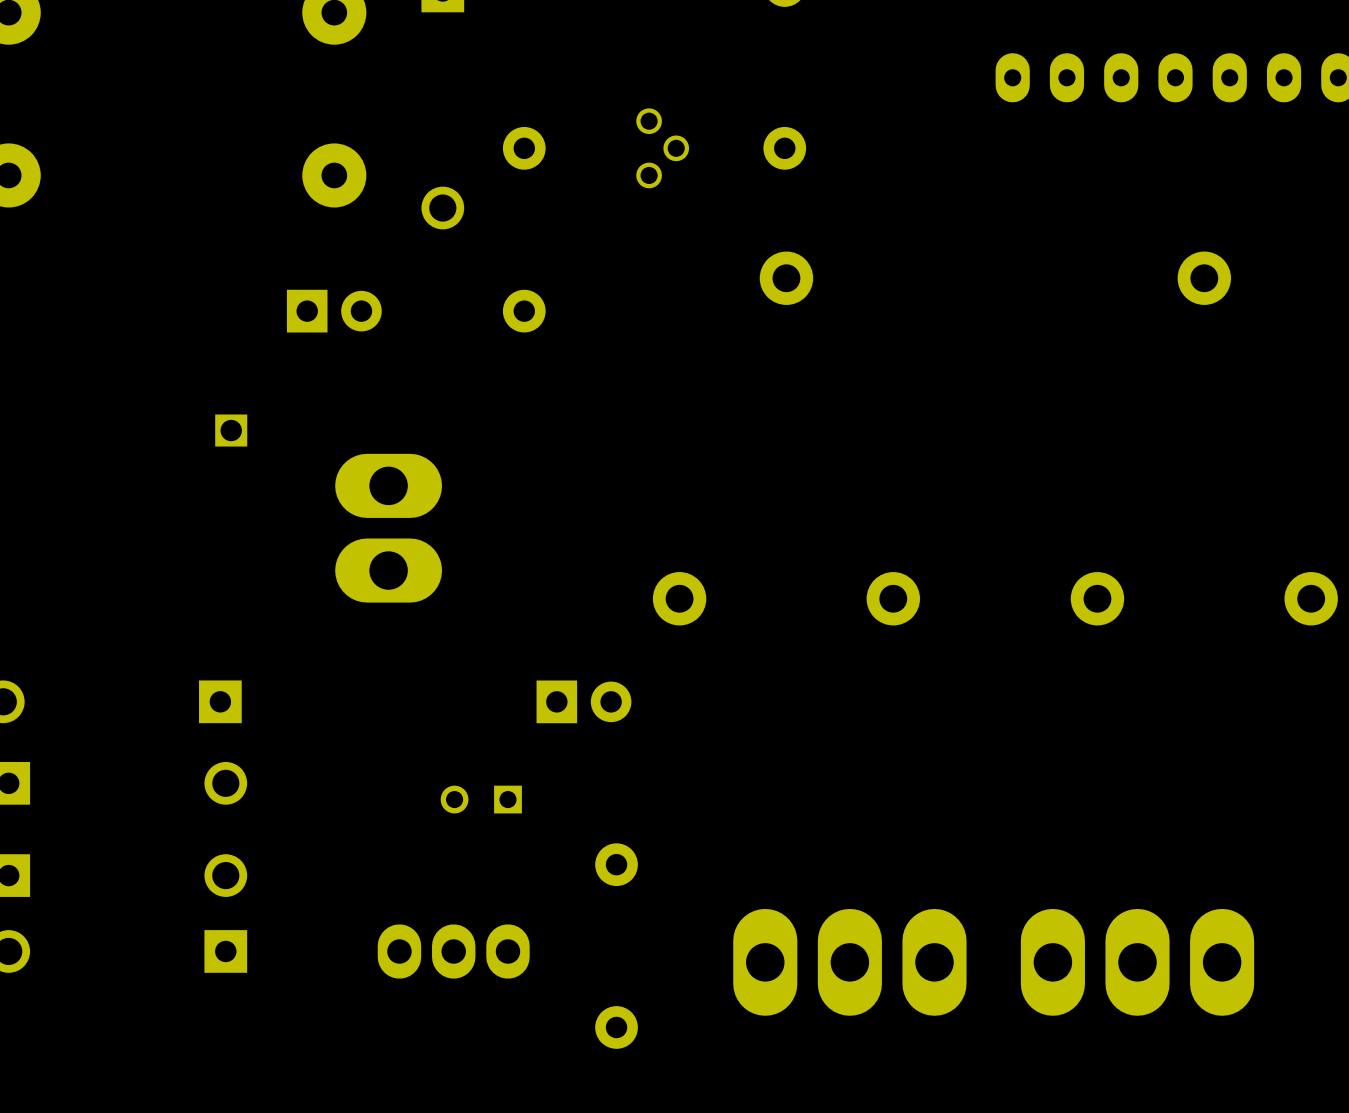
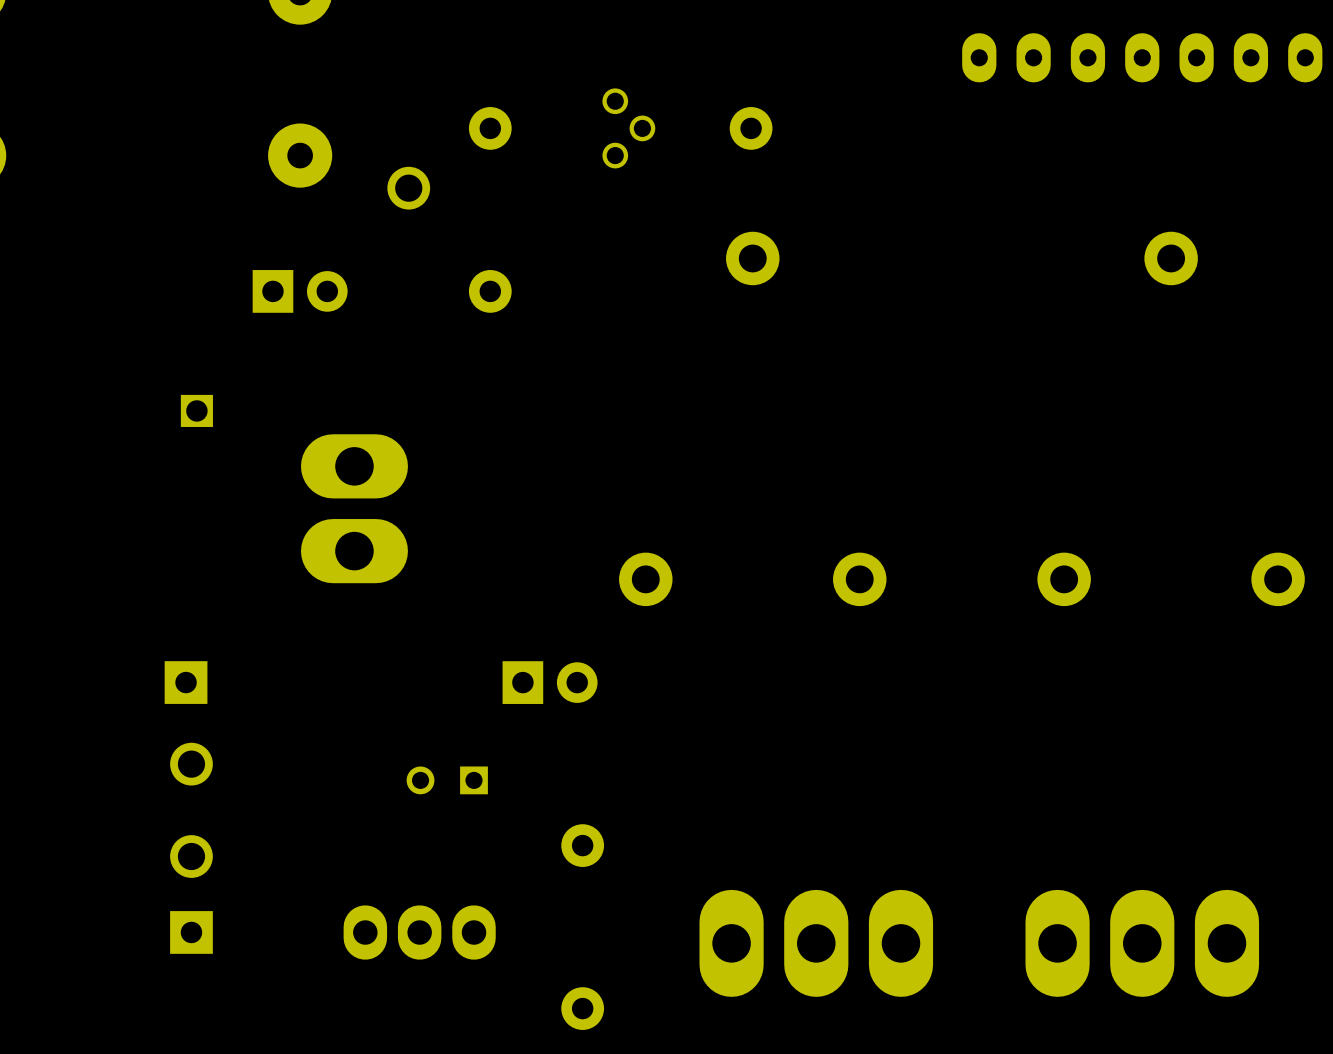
part position: (1137, 962) -> (1142, 943)

